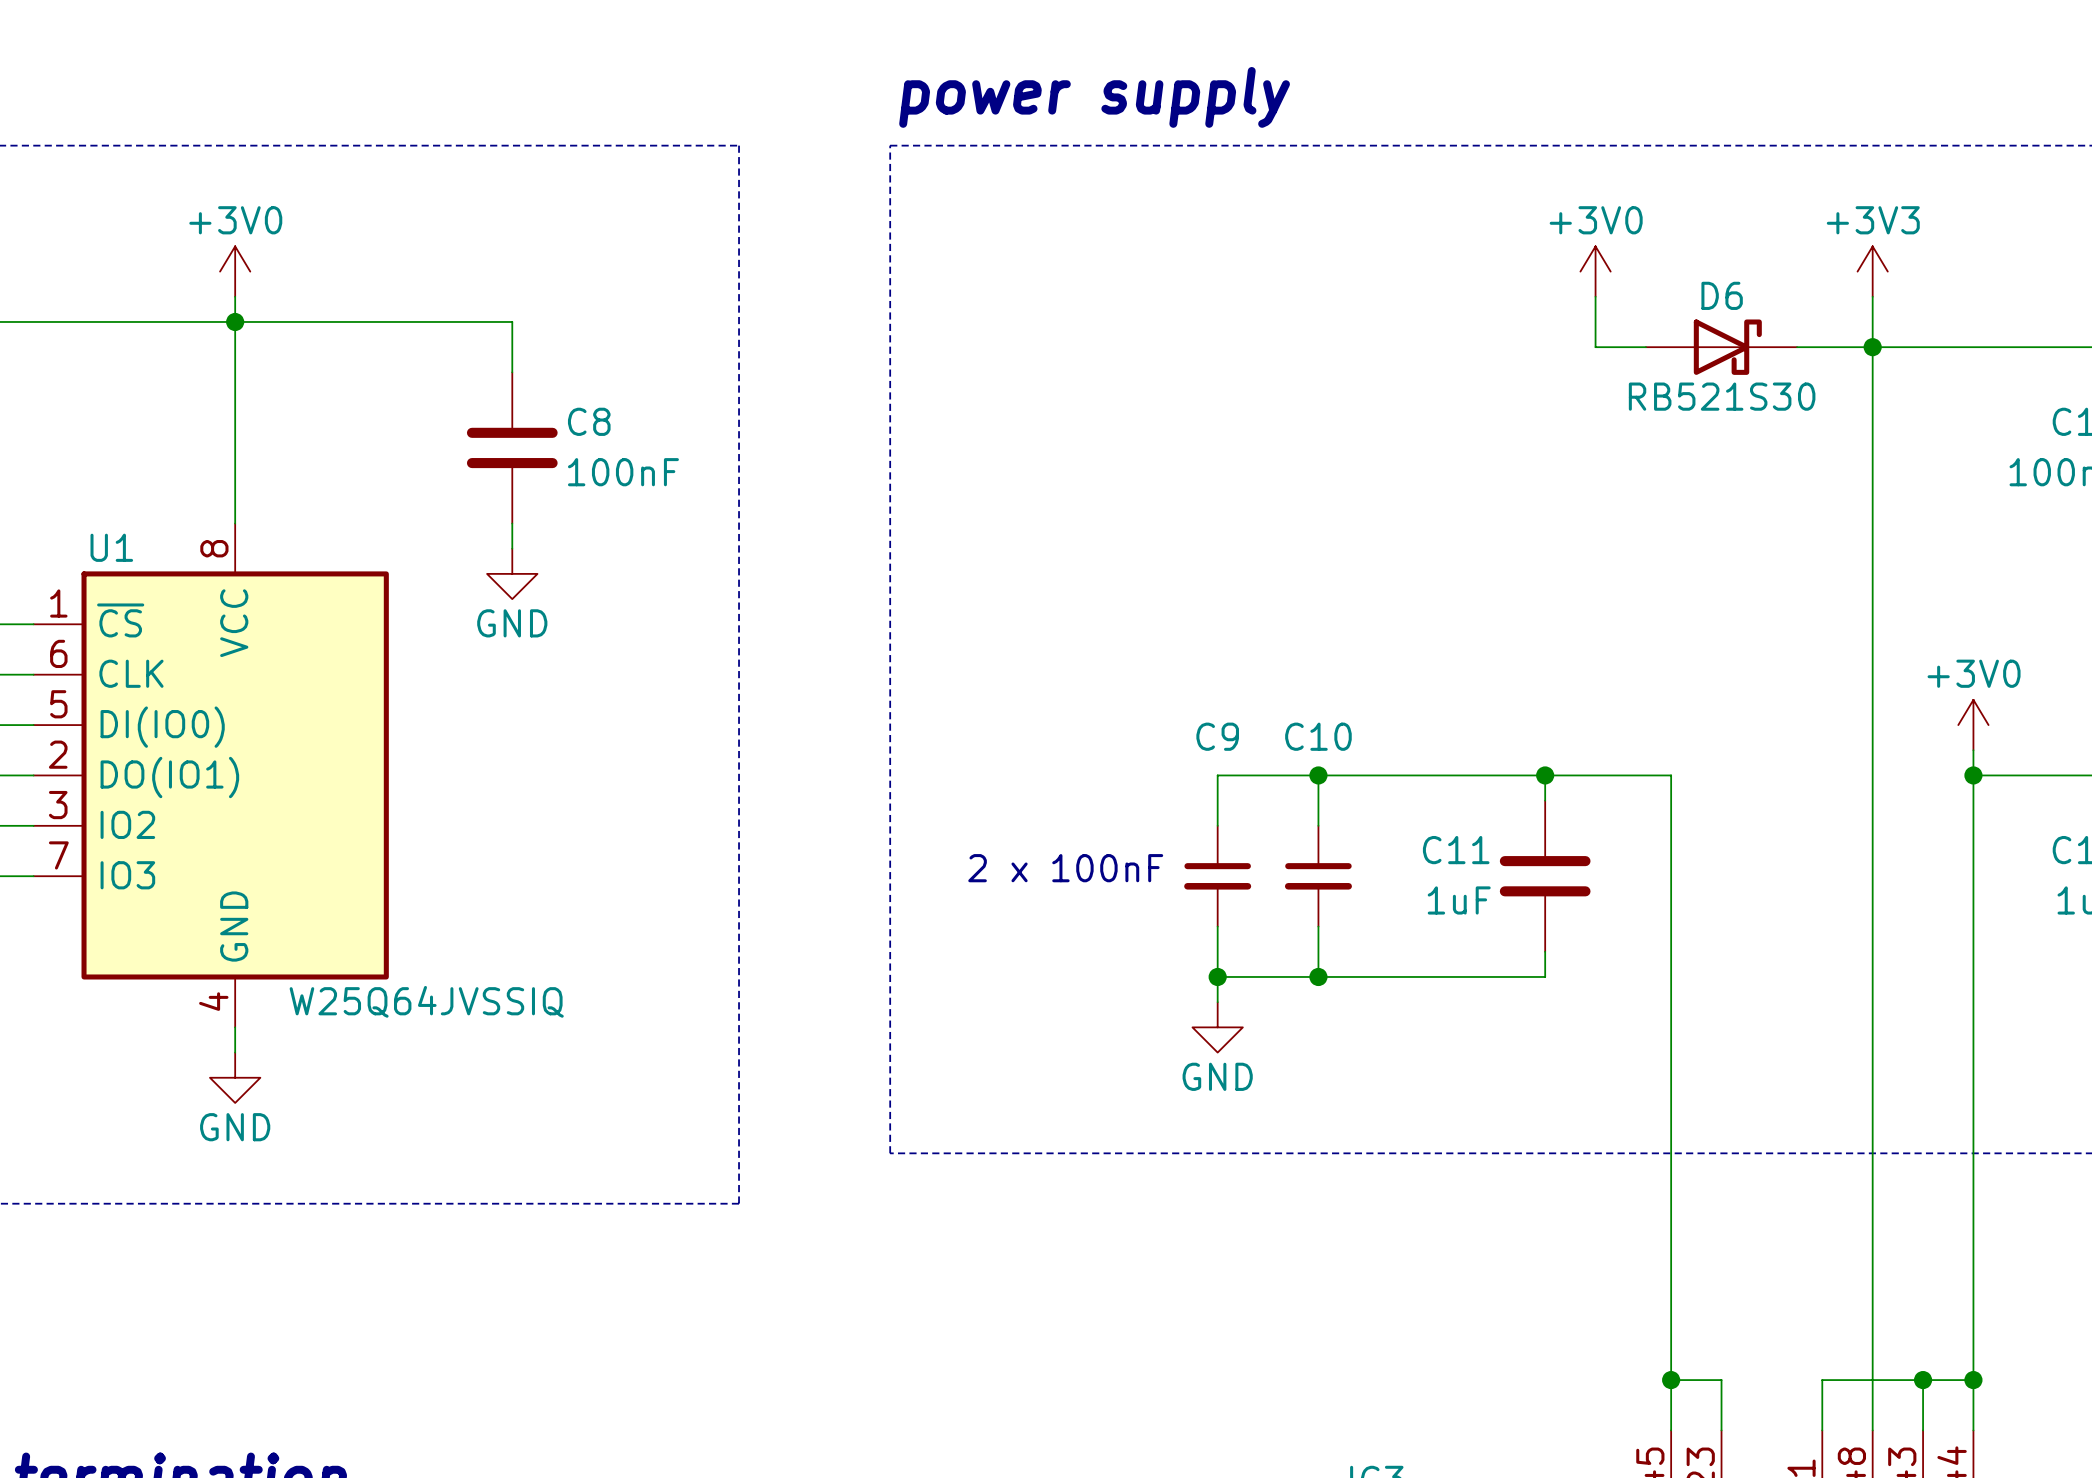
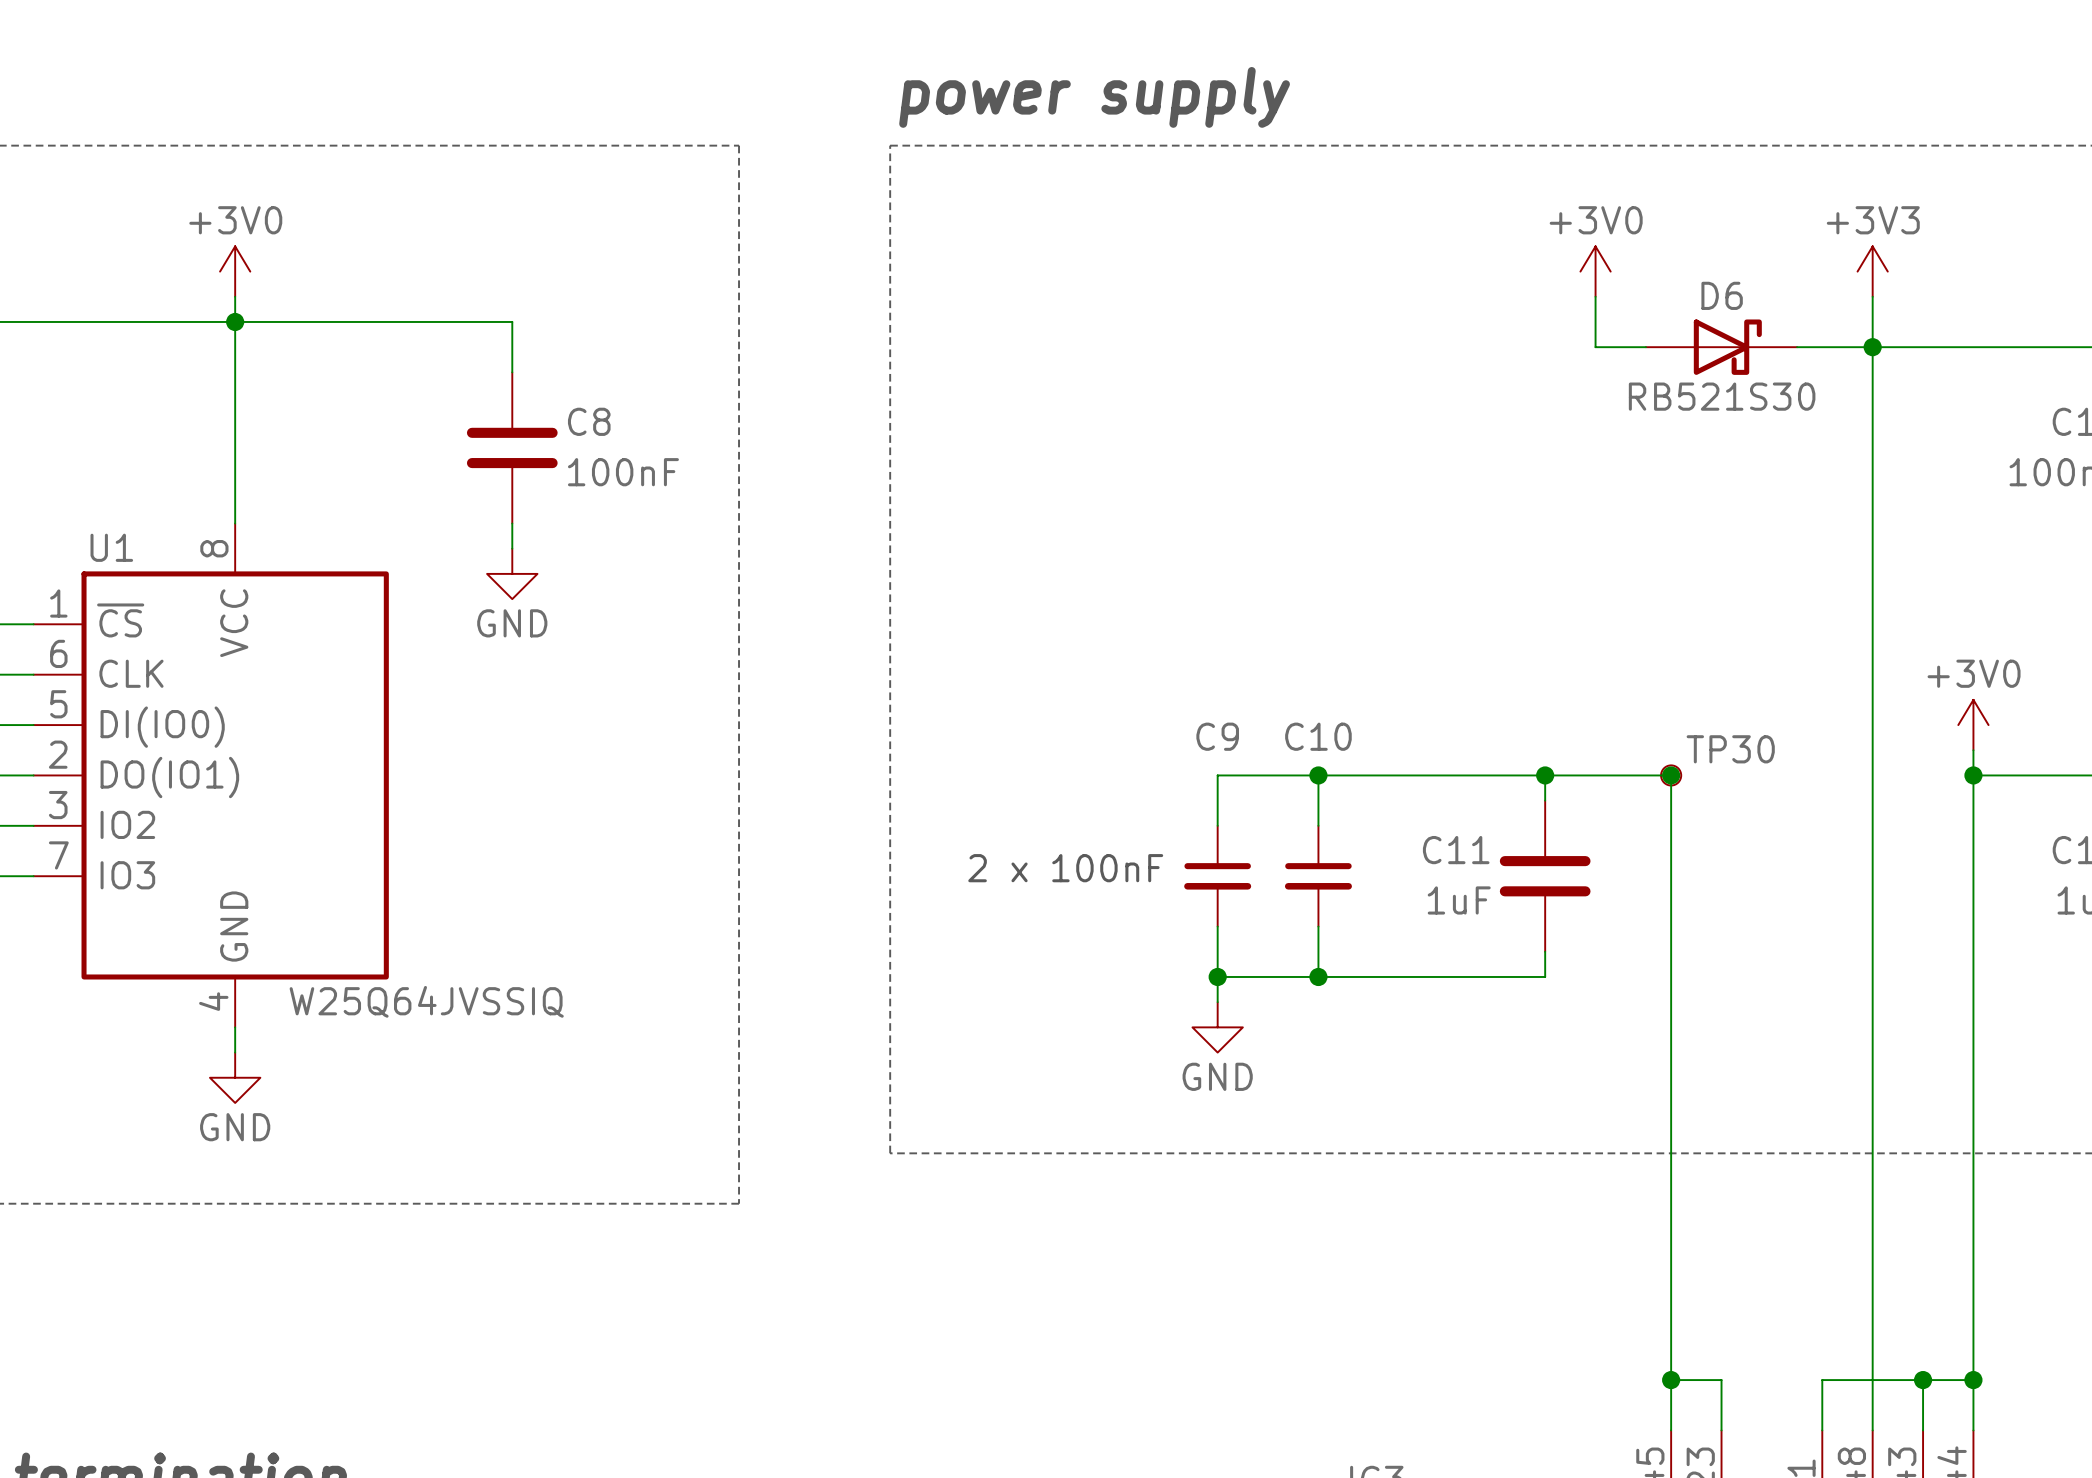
junction: none -> (1671, 775)
TP30: none -> (1671, 775)

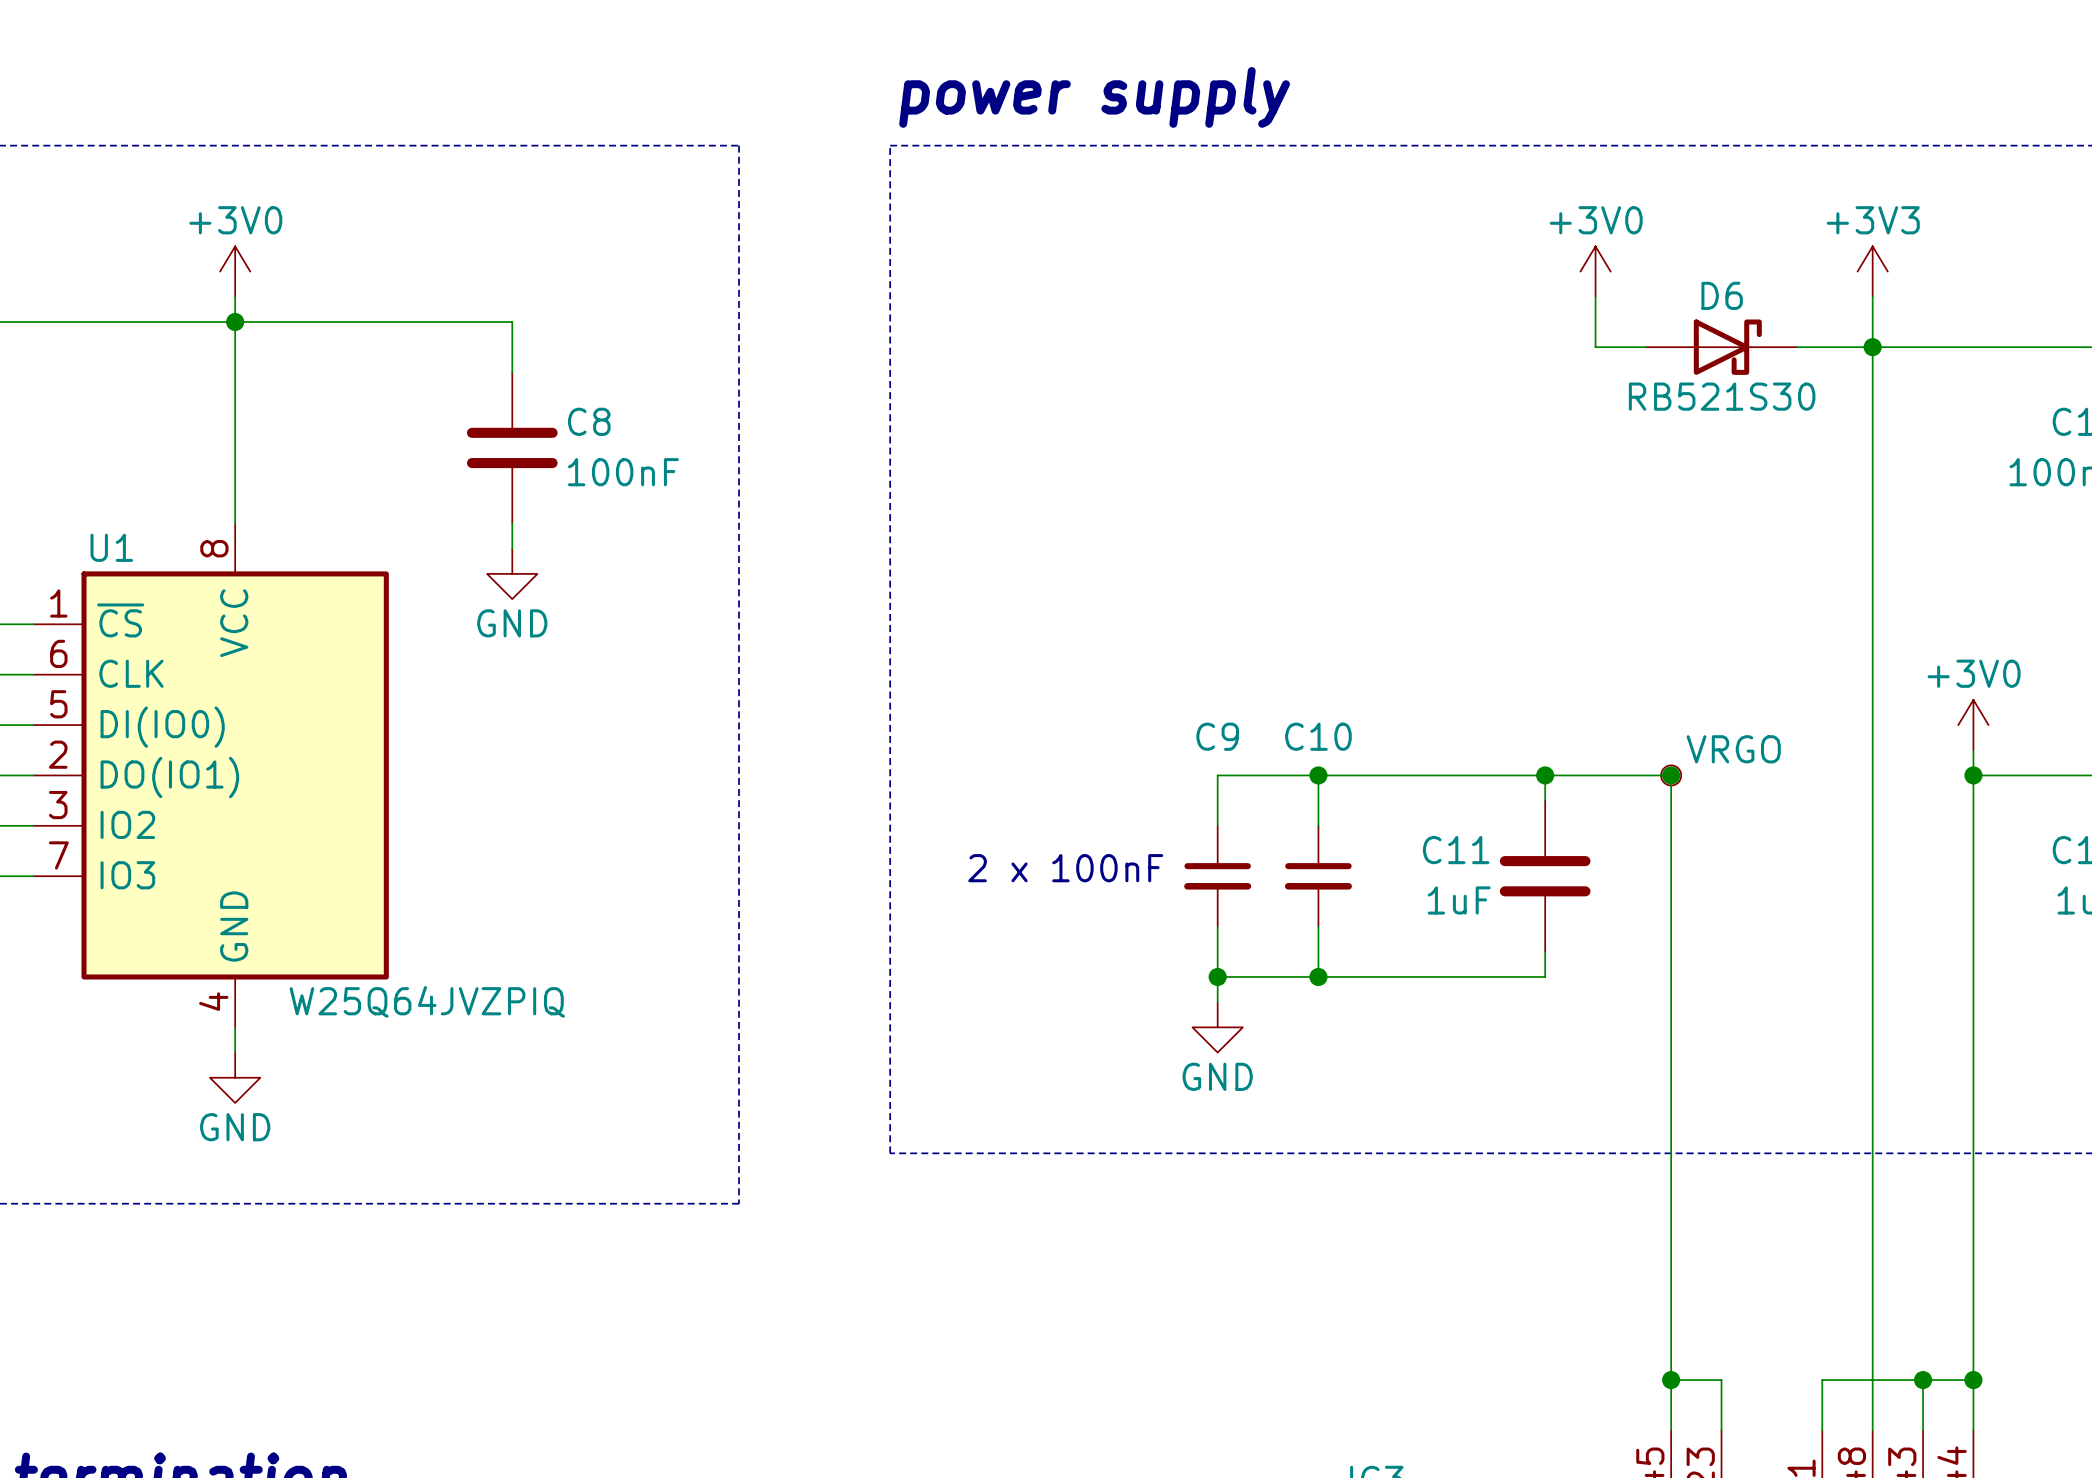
TP30 name: TP30 (1730, 749) -> none
TP30 value: none -> VRGO (1733, 749)
U1 value: W25Q64JVSSIQ (426, 1001) -> W25Q64JVZPIQ (427, 1001)

